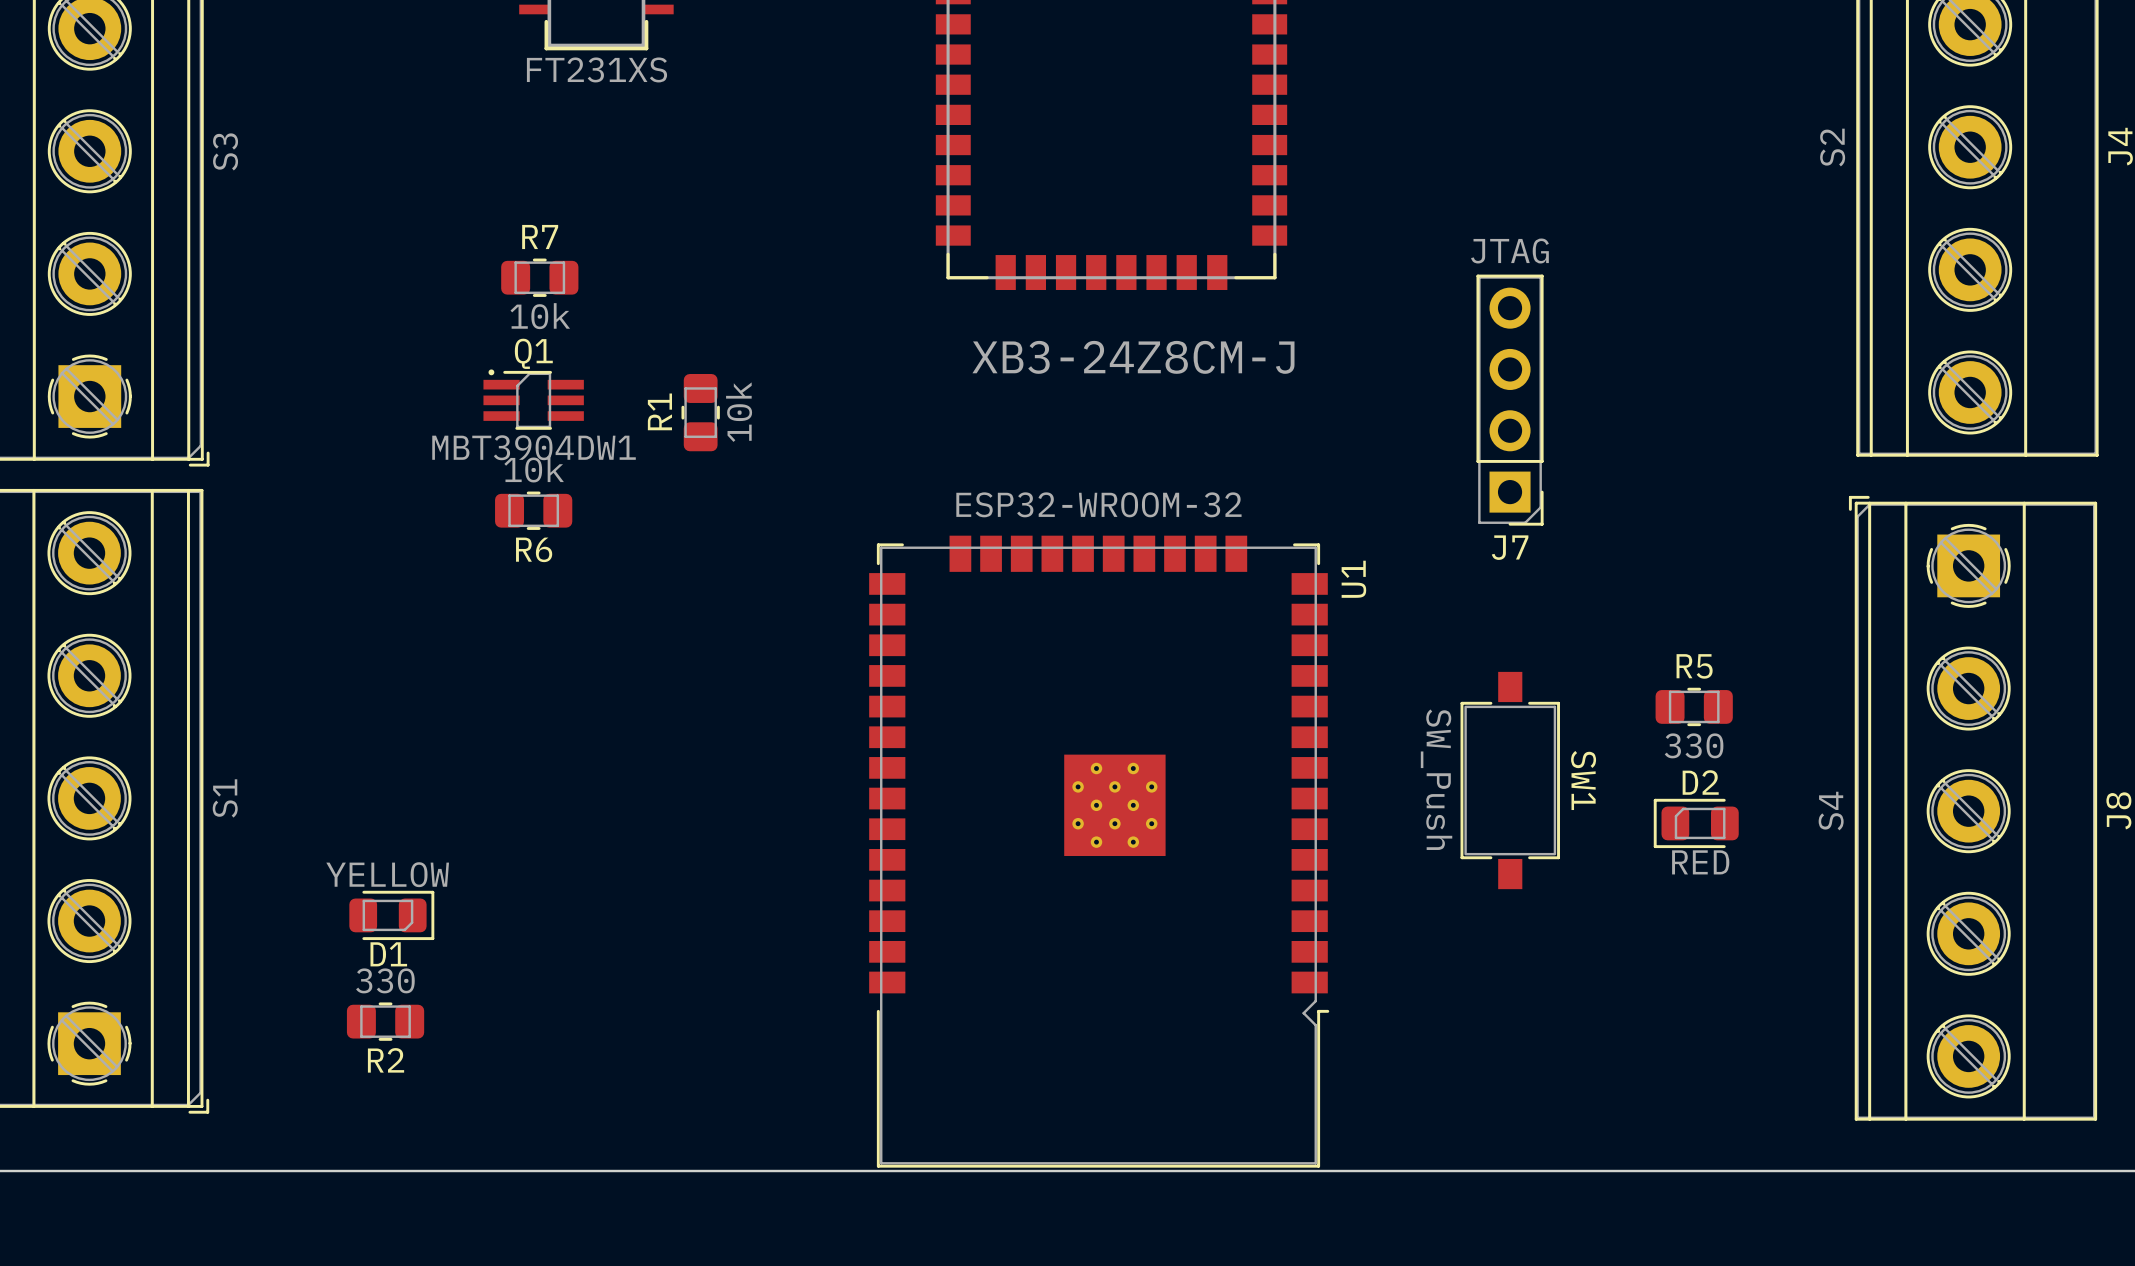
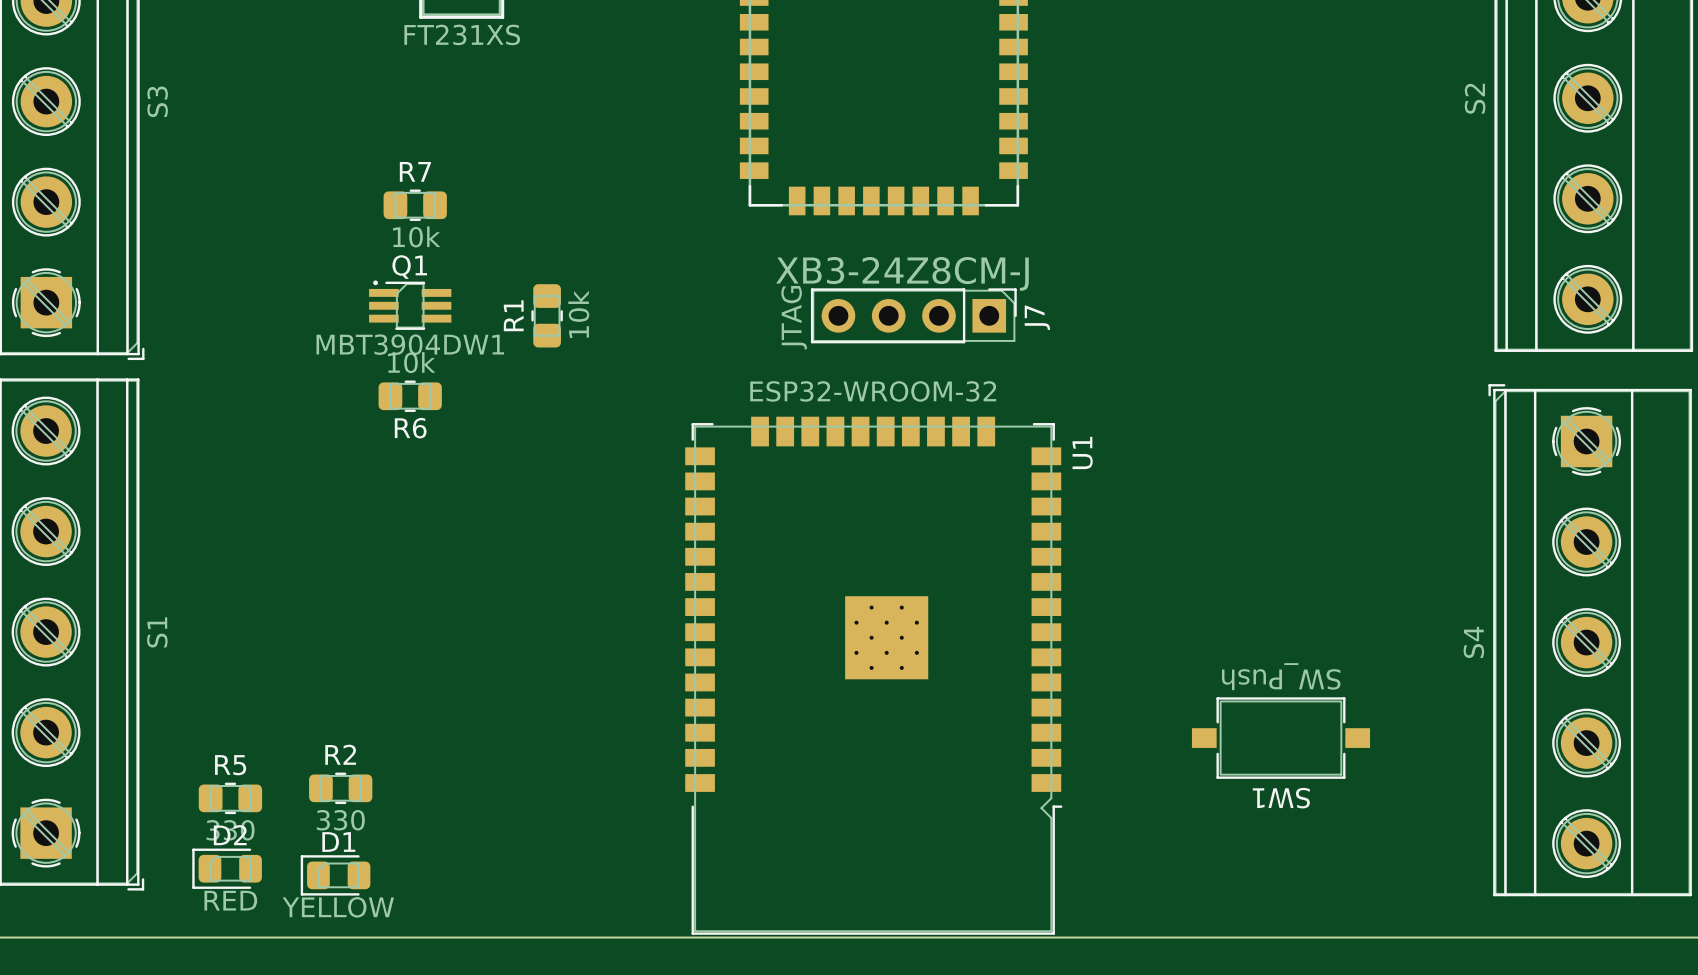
J7 rotation: 0° (1510, 400) -> 90° counterclockwise (913, 315)
J7 position: (1510, 400) -> (913, 315)
R5 position: (1694, 706) -> (230, 798)
SW1 rotation: 0° (1510, 780) -> 90° clockwise (1280, 738)
SW1 position: (1510, 780) -> (1280, 738)
D2 position: (1696, 823) -> (227, 868)
D1 rotation: 0° (391, 915) -> 180° (335, 875)
D1 position: (391, 915) -> (335, 875)
R2 value position: 330 (385, 980) -> 330 (340, 820)
R2 position: (385, 1021) -> (340, 788)
R2 name position: R2 (386, 1060) -> R2 (340, 754)

